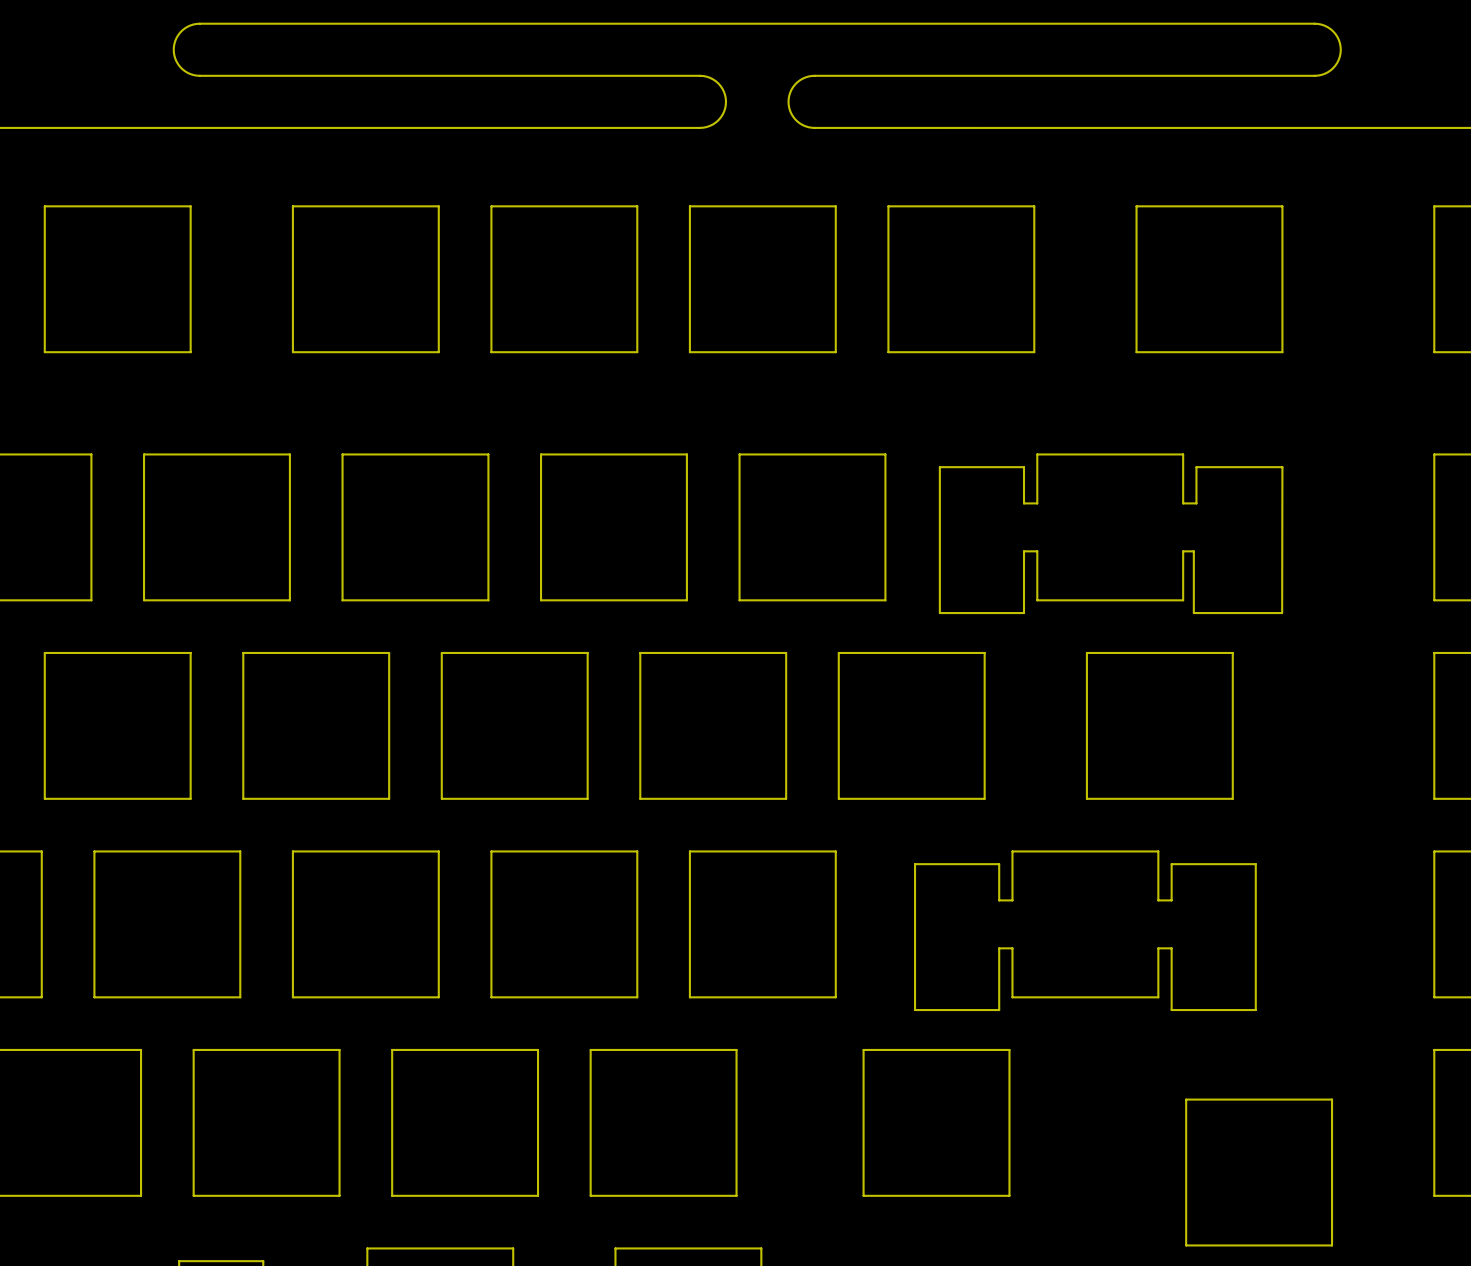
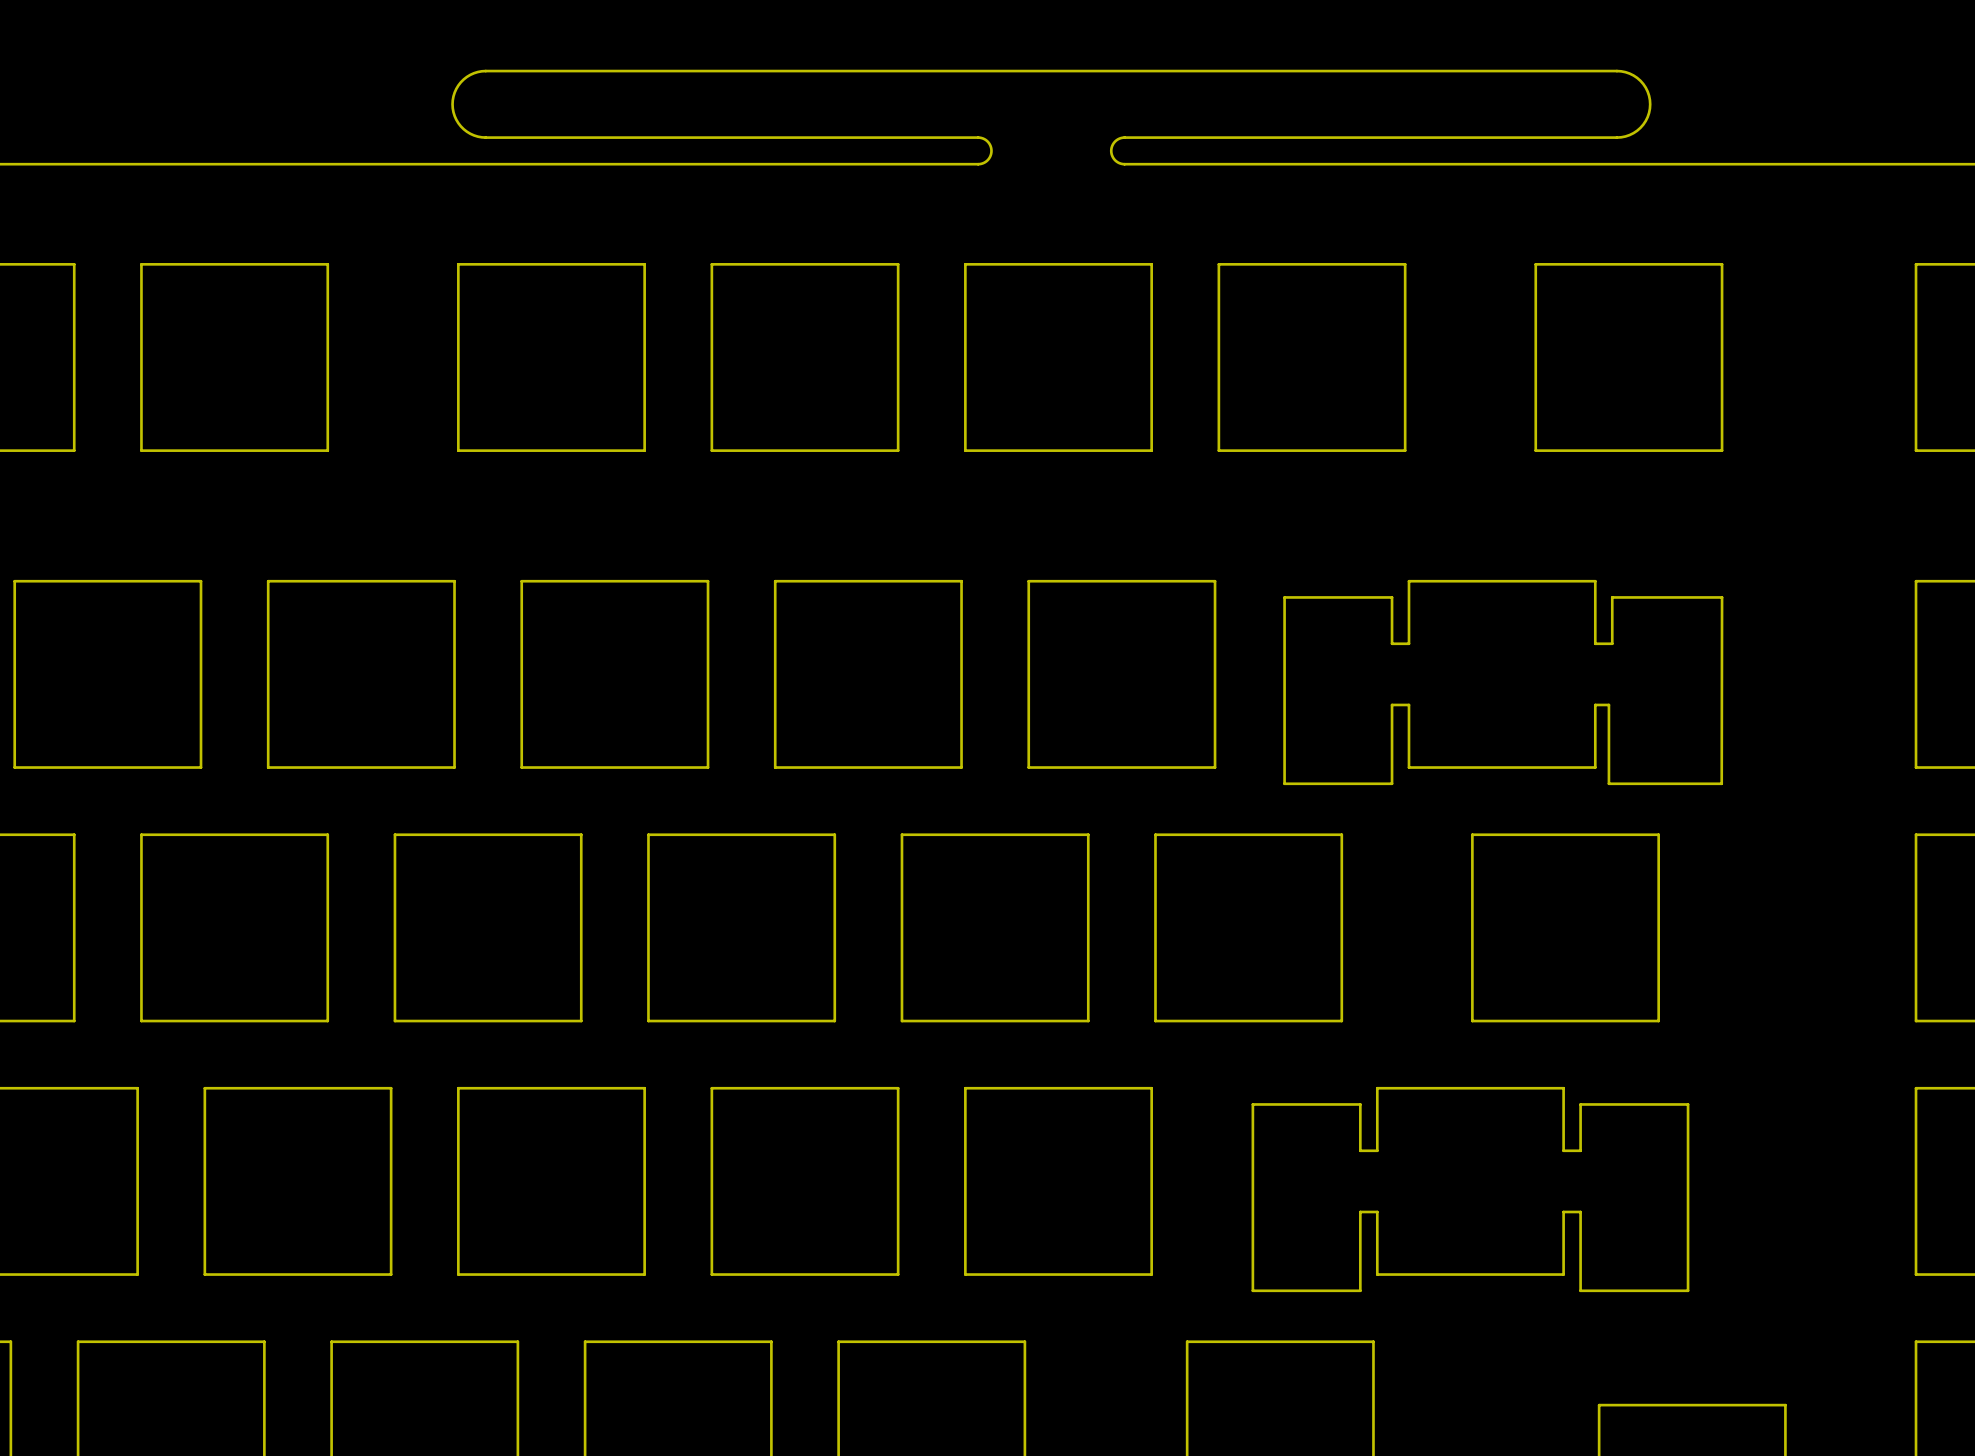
board edge: (699, 127) (709, 125) (718, 120) (724, 111) (726, 101) (724, 91) (718, 83) (703, 76) (199, 75) (187, 72) (180, 67) (174, 56) (173, 46) (176, 37) (182, 30) (190, 25) (199, 23) (1314, 23) (1330, 29) (1337, 36) (1340, 46) (1338, 59) (1333, 68) (1324, 73) (1314, 75) (811, 76) (802, 78) (795, 84) (790, 92) (788, 105) (791, 113) (797, 121) (805, 126) (814, 127) -> (978, 164) (988, 159) (991, 150) (987, 140) (978, 137) (481, 137) (470, 133) (458, 123) (453, 112) (452, 100) (456, 88) (463, 79) (474, 73) (485, 71) (1616, 71) (1629, 73) (1640, 80) (1647, 91) (1649, 99) (1649, 112) (1643, 124) (1633, 133) (1621, 137) (1124, 137) (1115, 141) (1111, 150) (1115, 160) (1124, 164)

